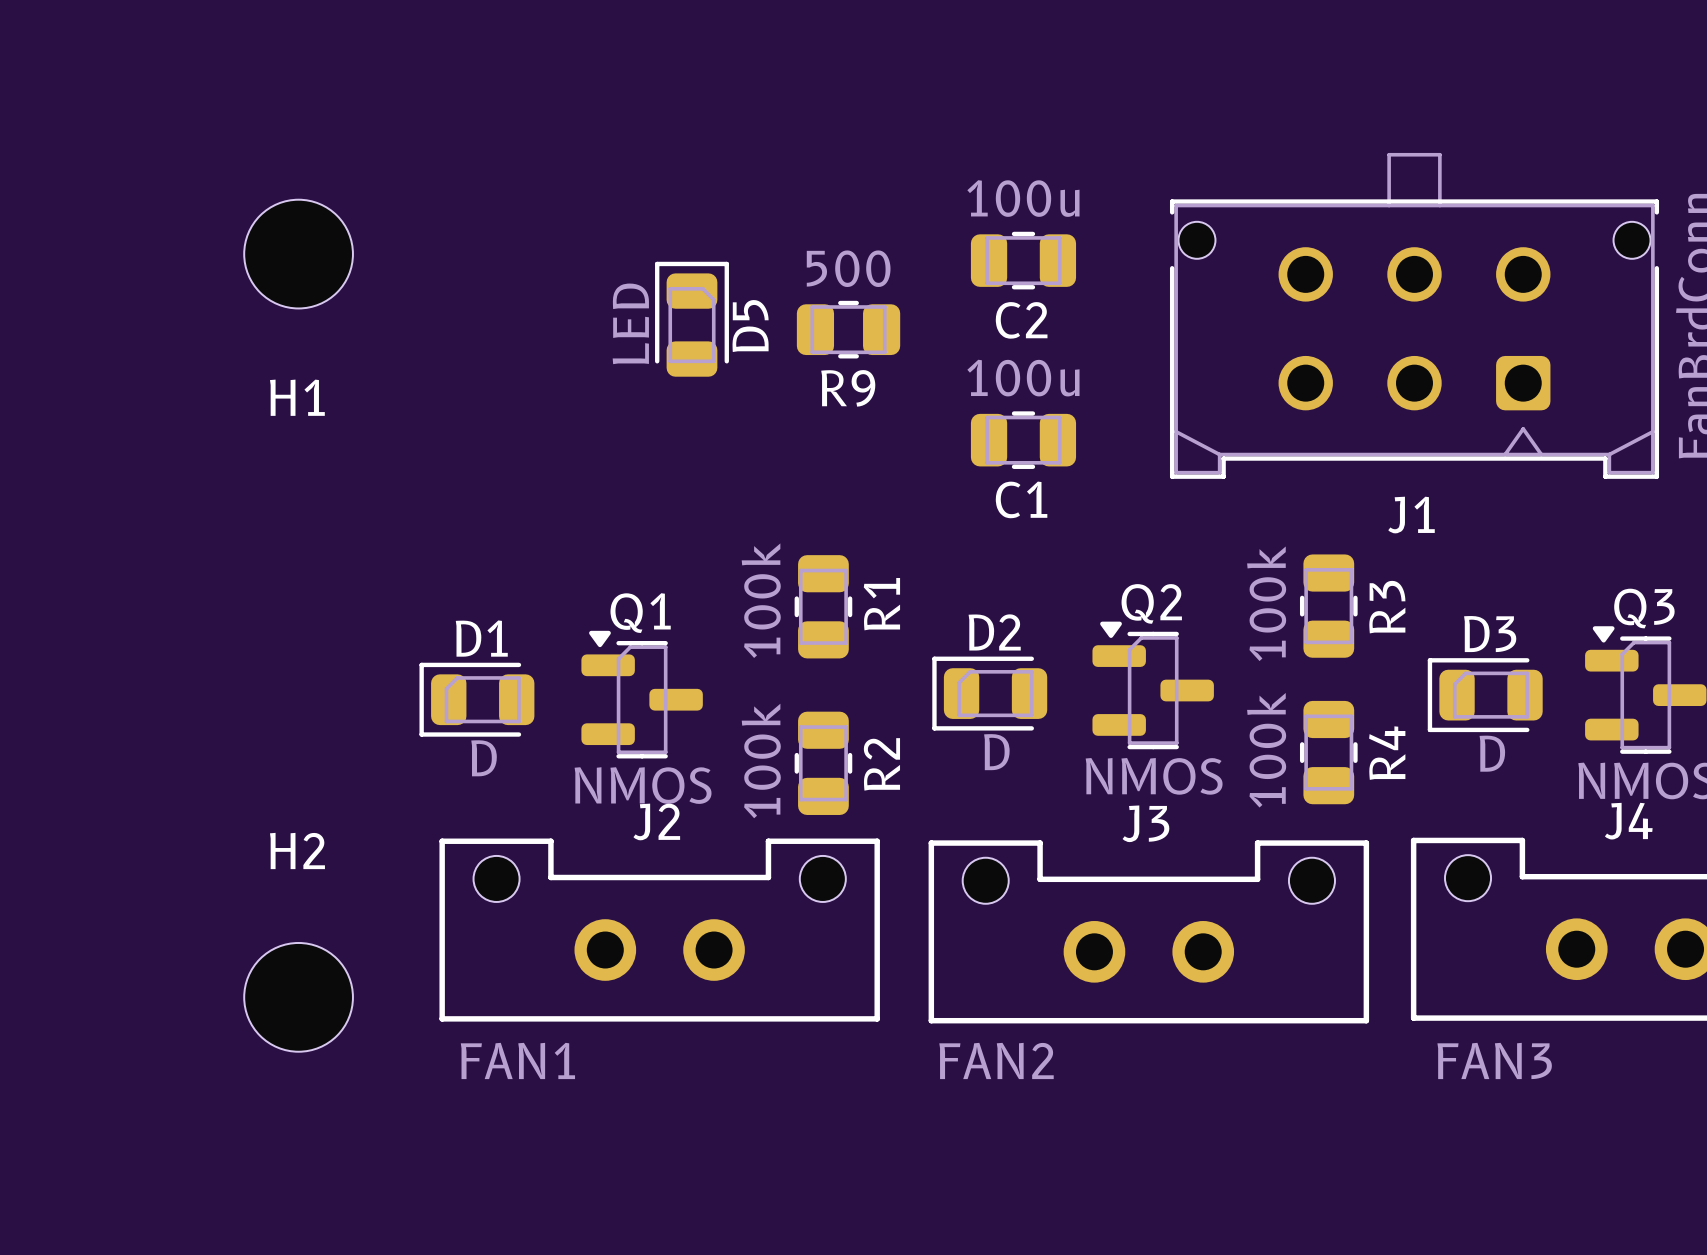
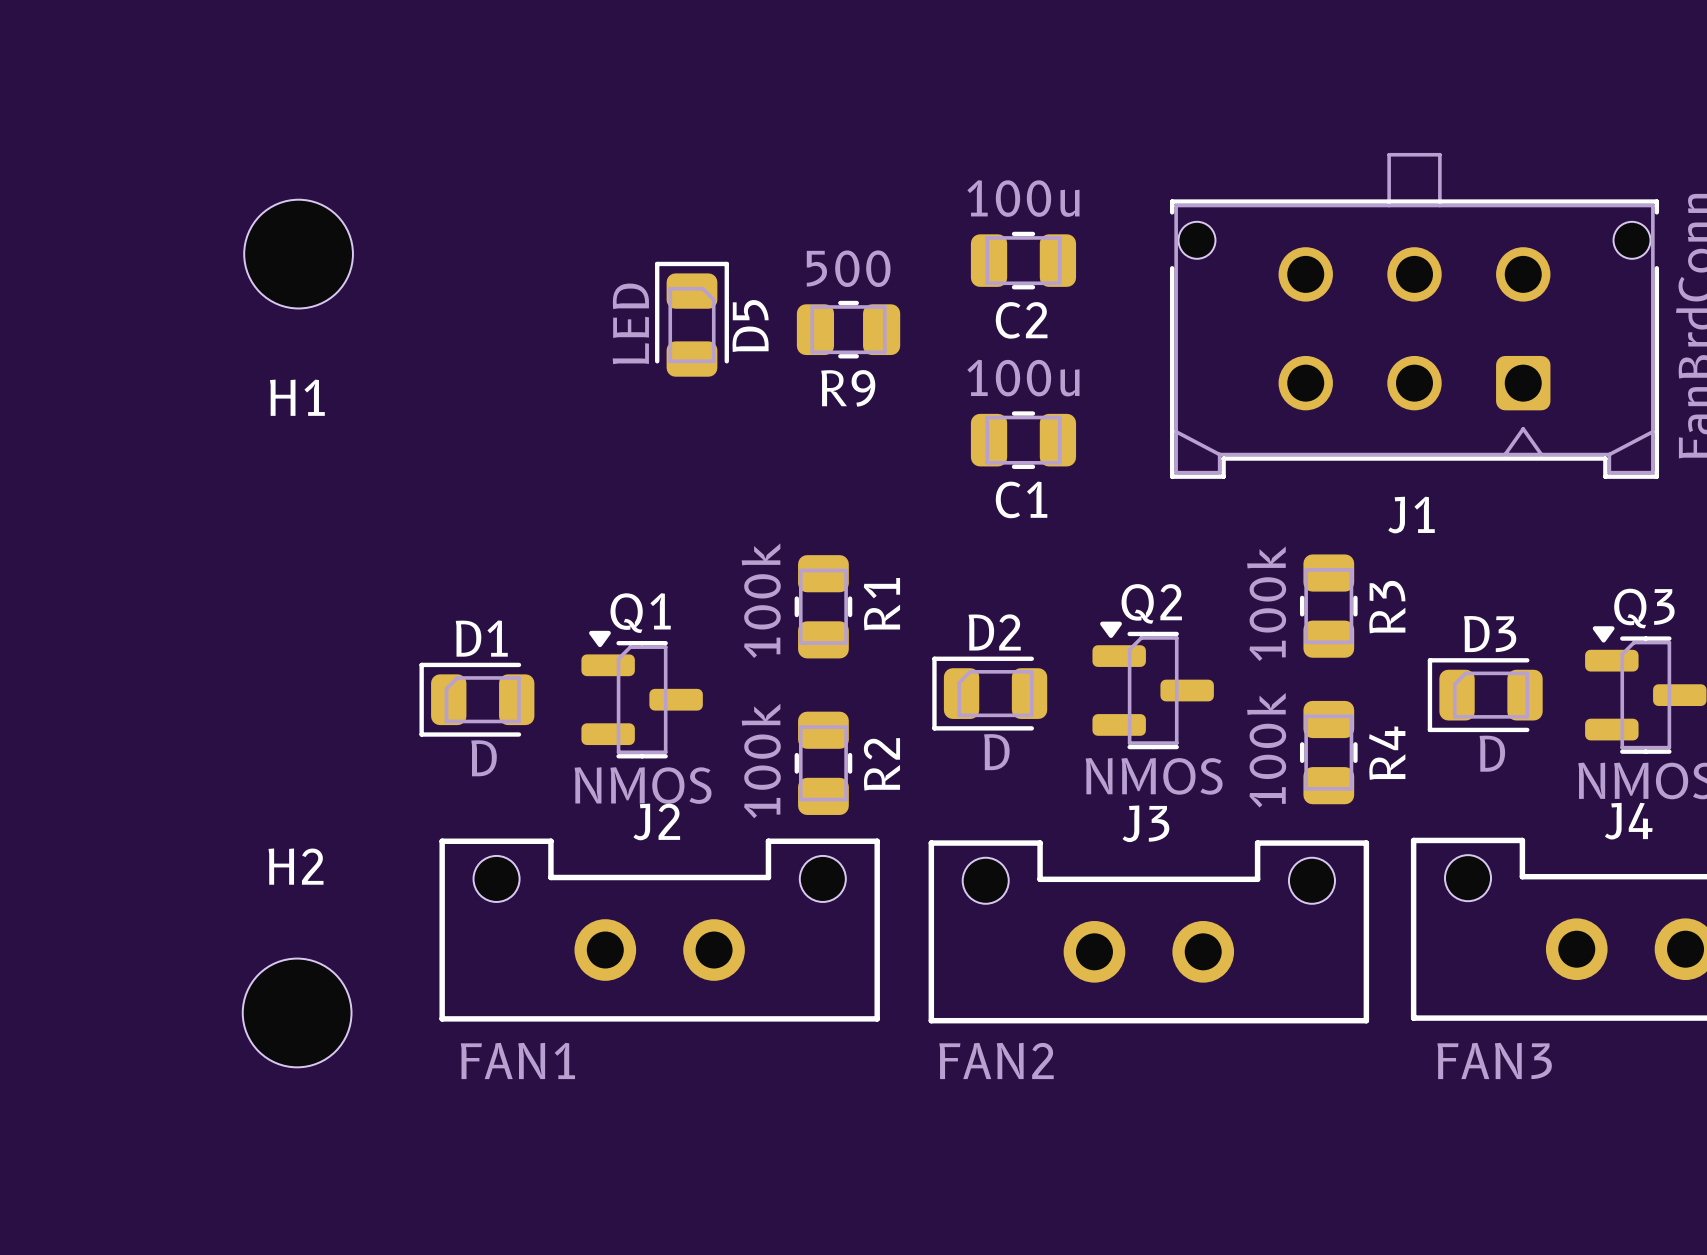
H2 position: (298, 997) -> (297, 1012)

